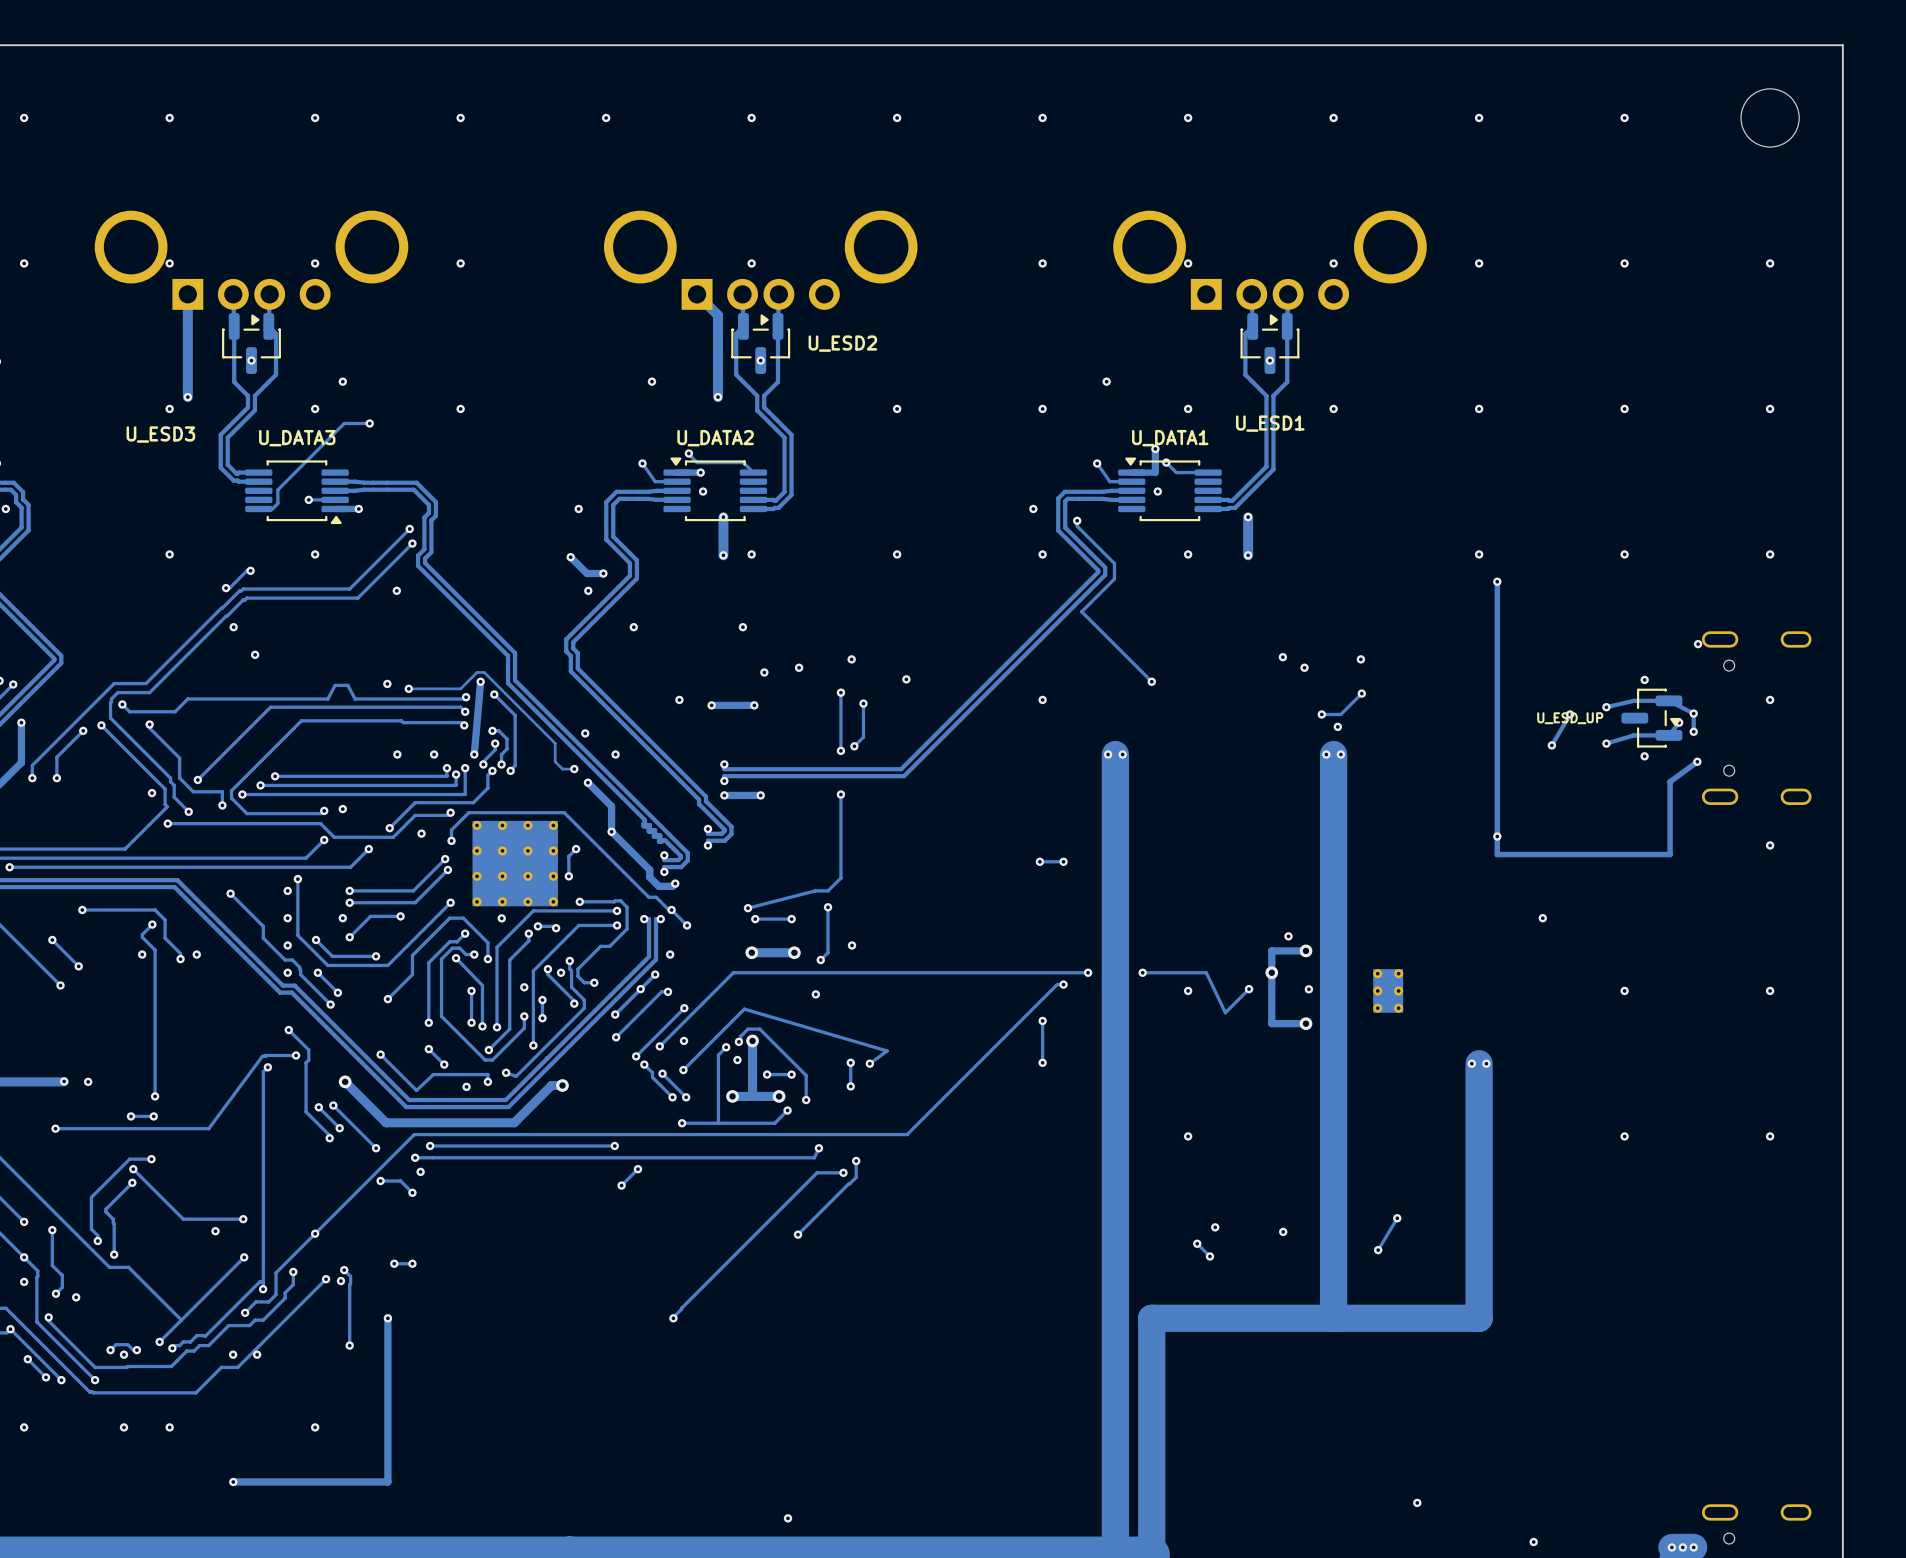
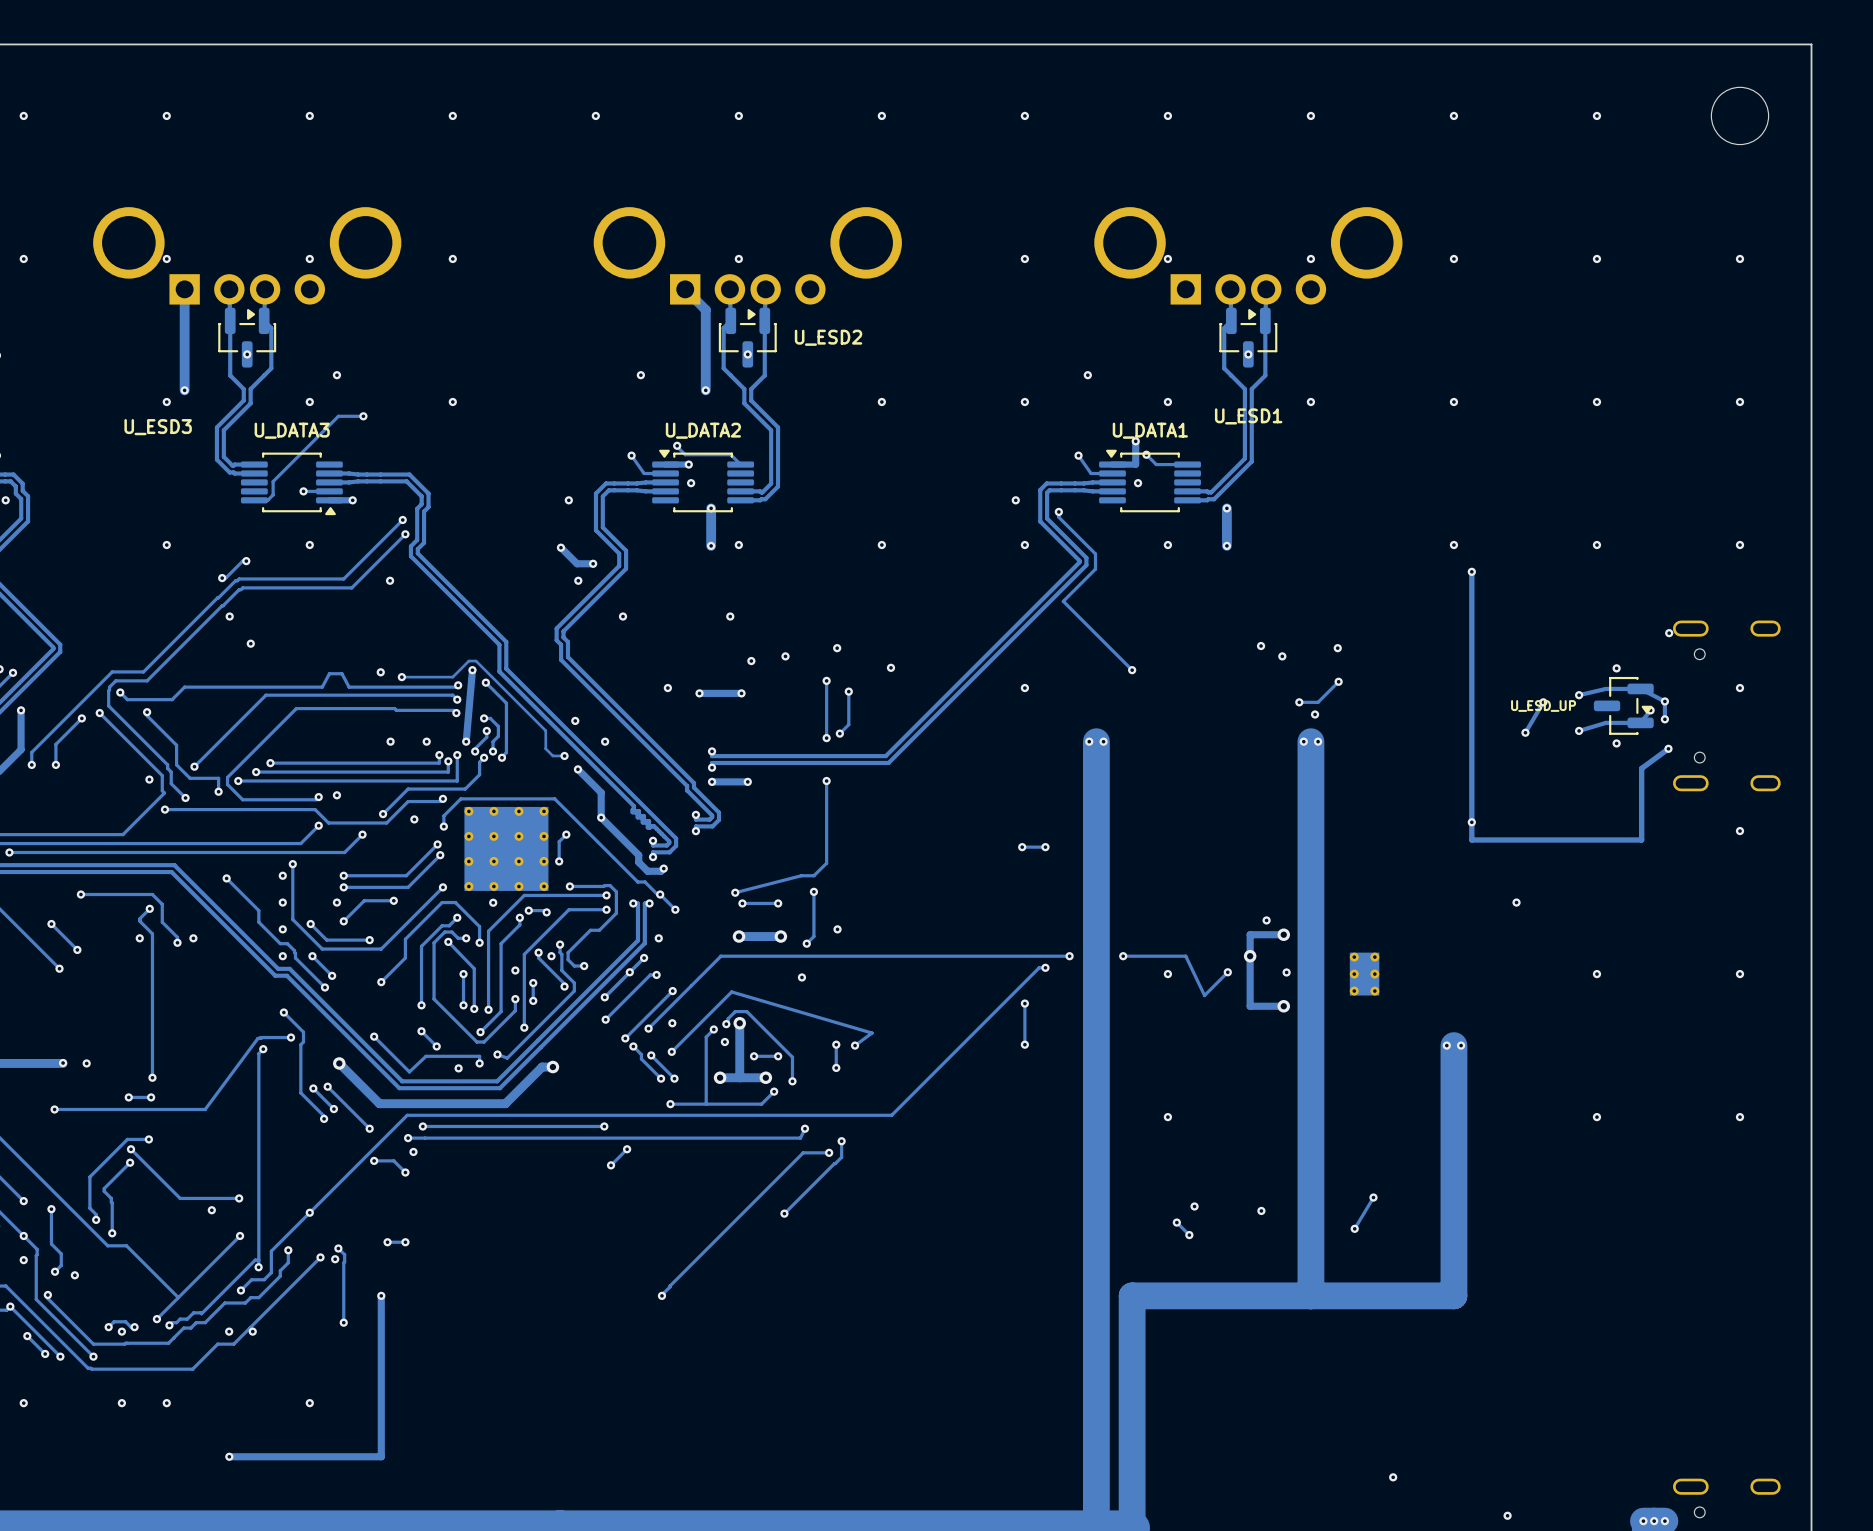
via: (788, 1518) -> none

